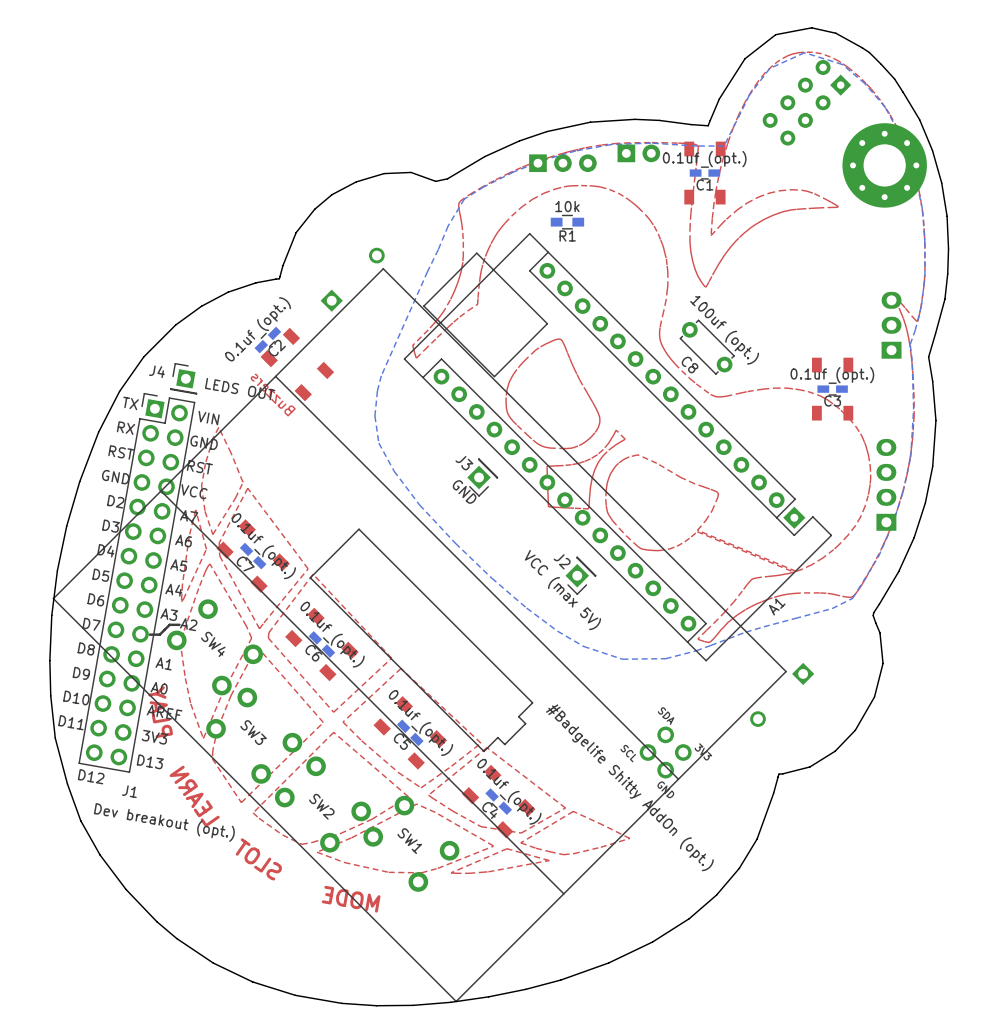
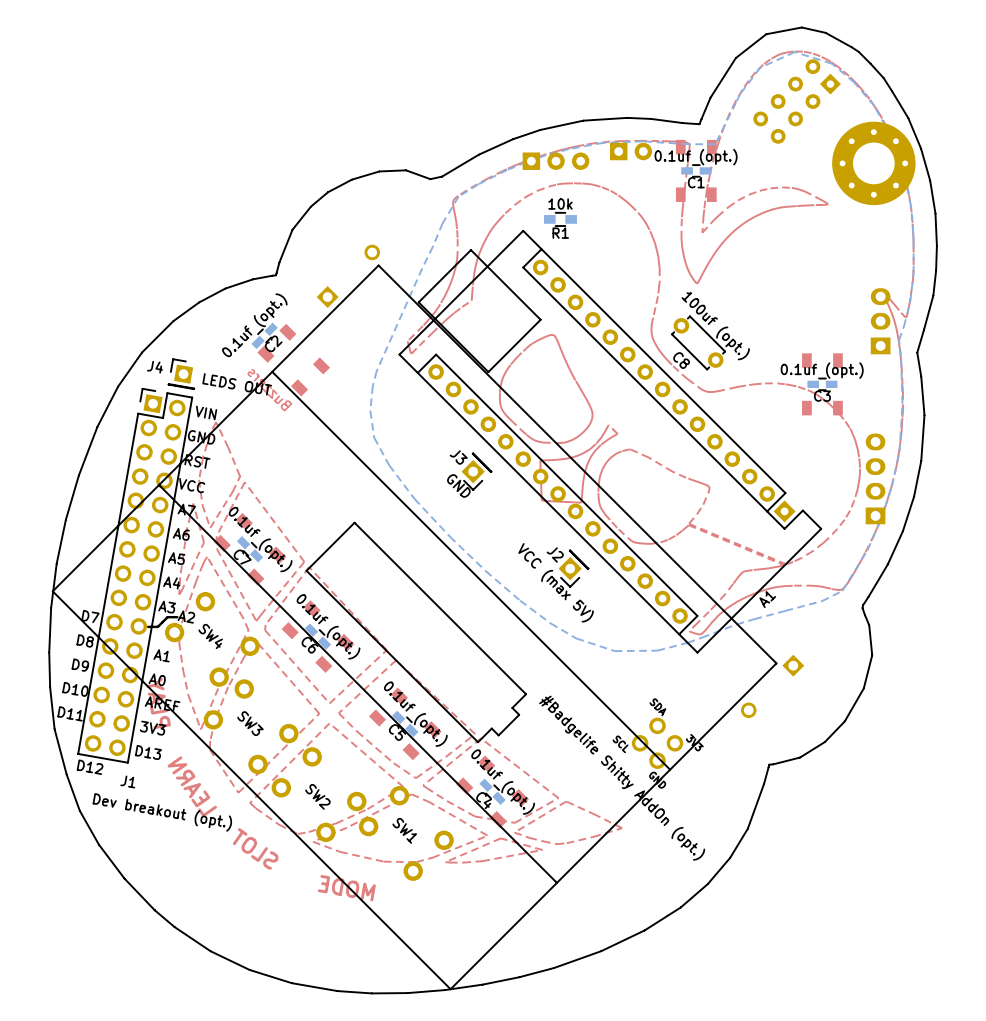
text: TX (131, 403) -> none
text: RX (126, 428) -> none
text: RST (121, 452) -> none
text: GND (115, 477) -> none
text: D2 (115, 501) -> none
text: D3 (111, 526) -> none
text: D4 (105, 550) -> none
text: D5 (100, 575) -> none
text: D6 (95, 599) -> none

